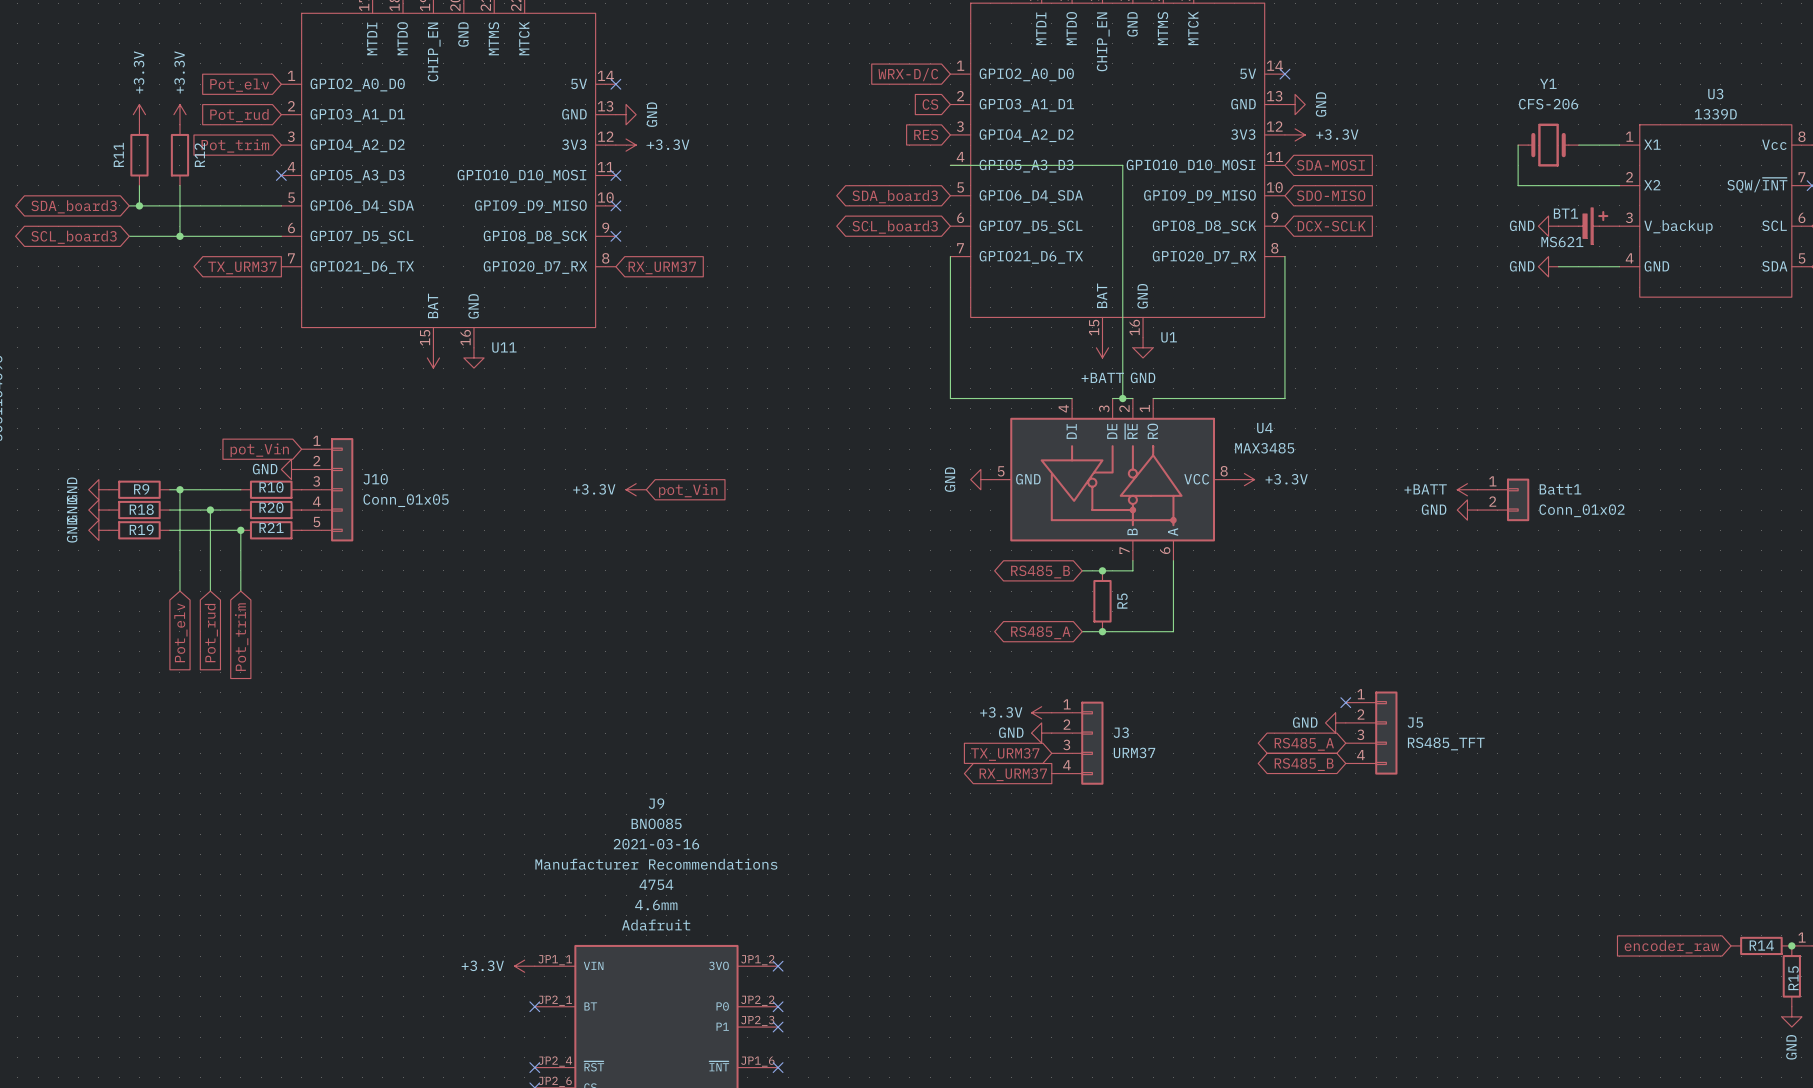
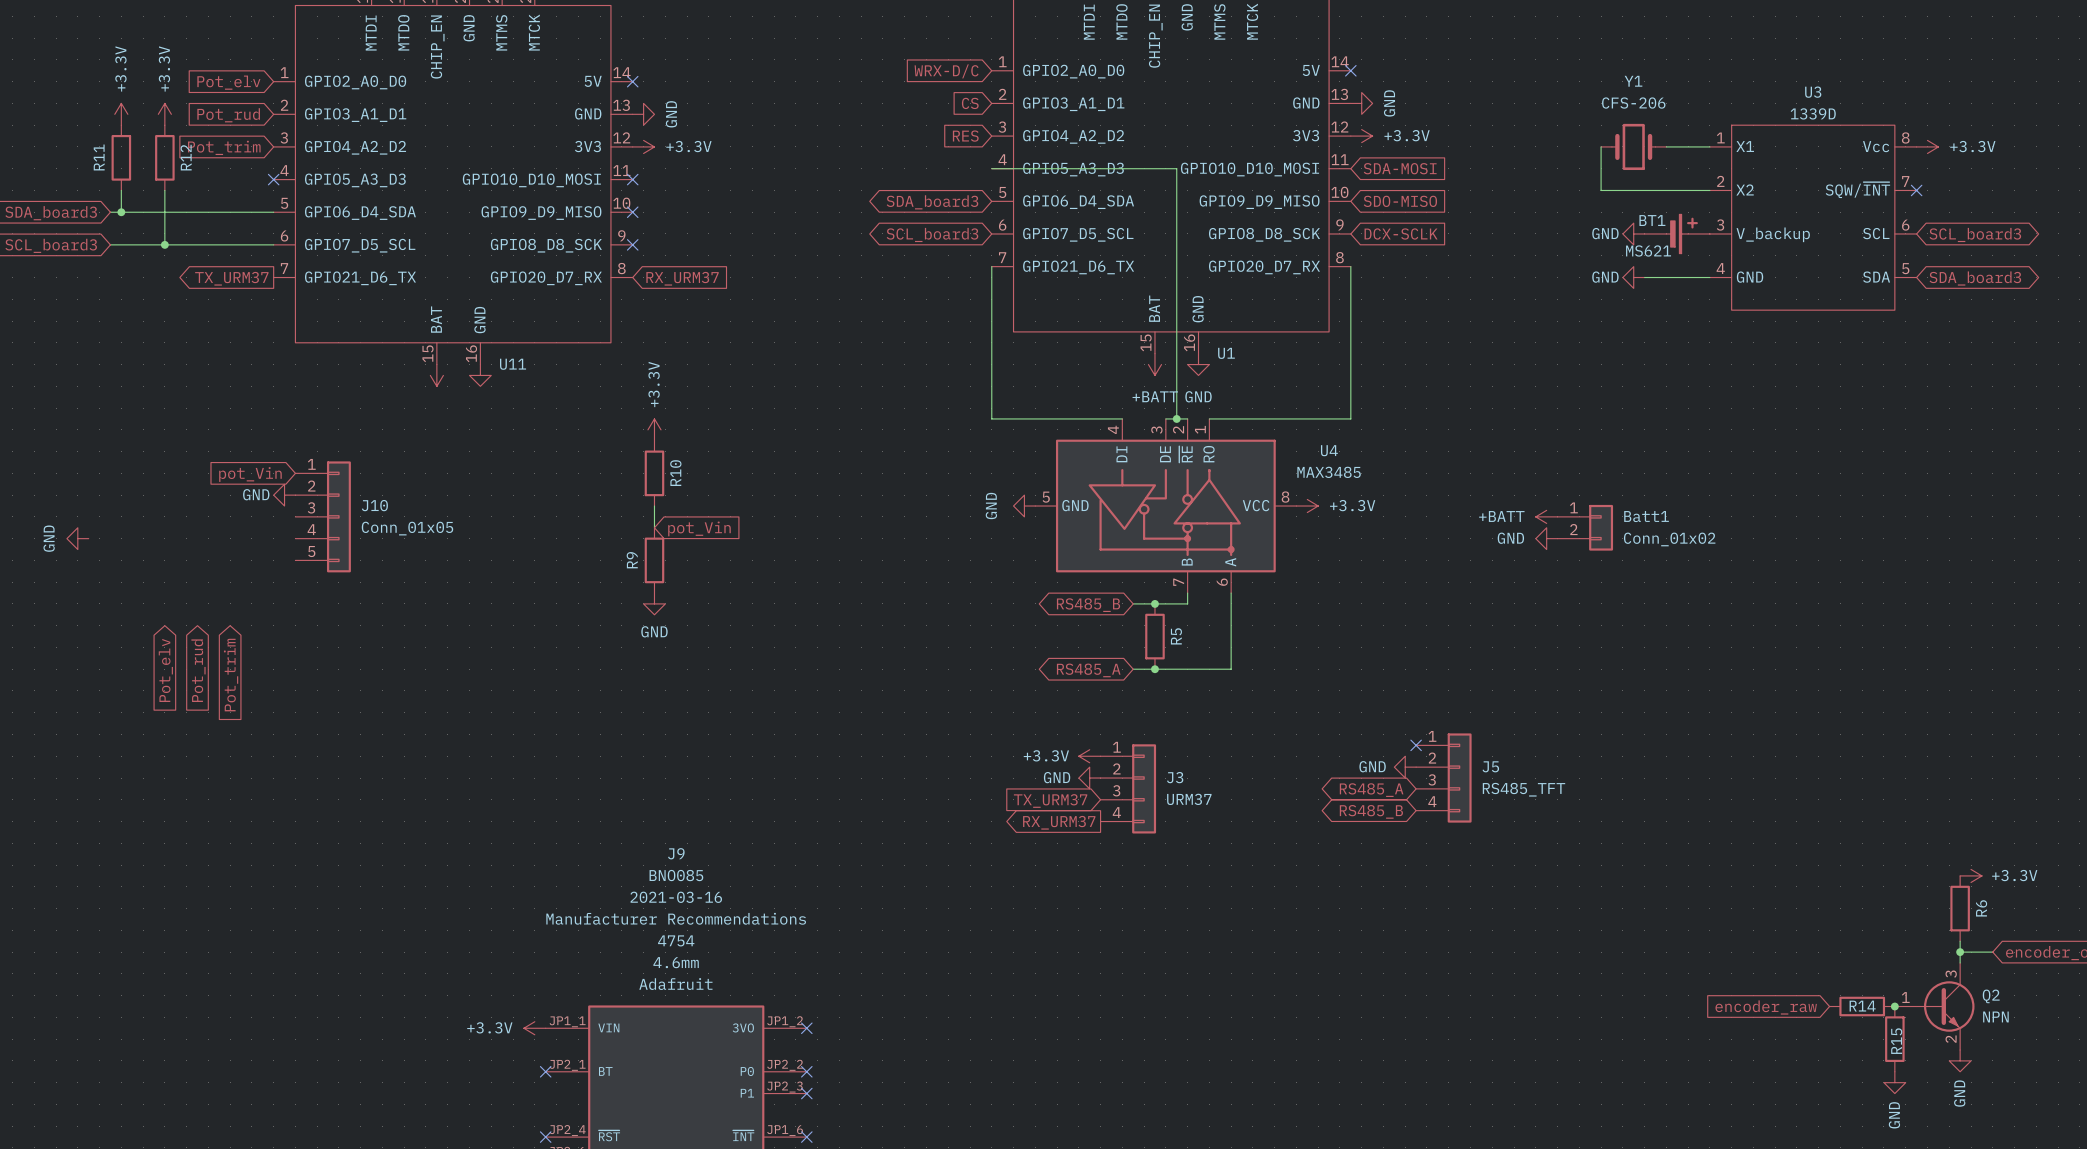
wire: none -> (654, 506) (654, 527)
R10 name position: R10 (271, 487) -> R10 (675, 473)
power symbol: GND (98, 489) -> none
R9 rotation: 0° (139, 489) -> 90° clockwise (654, 560)
R9 position: (139, 489) -> (654, 560)
R9 name position: R9 (141, 489) -> R9 (632, 560)
wire: (169, 489) (240, 489) -> none
wire: (179, 489) (179, 591) -> none
junction: (179, 489) -> none
R10 rotation: 0° (271, 489) -> 90° clockwise (654, 473)
R10 position: (271, 489) -> (654, 473)
power symbol rotation: 0° (636, 489) -> 90° clockwise (654, 429)
power symbol position: +3.3V (636, 489) -> +3.3V (654, 429)
global label position: pot_Vin (688, 490) -> pot_Vin (699, 528)
R18: (139, 510) -> none
wire: (169, 510) (240, 510) -> none
wire: (210, 510) (210, 591) -> none
junction: (210, 510) -> none
R20: (271, 510) -> none
power symbol: GND (98, 530) -> none
R19: (139, 530) -> none
wire: (169, 530) (240, 530) (240, 591) -> none
junction: (240, 530) -> none
R21: (271, 530) -> none
power symbol: none -> GND (654, 603)

